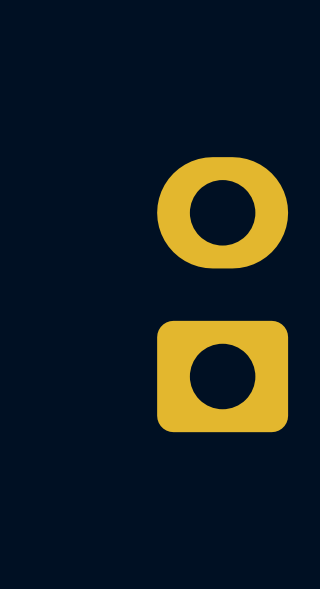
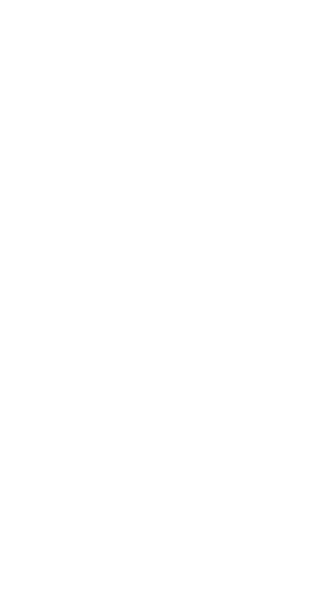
part: (222, 294) -> none

